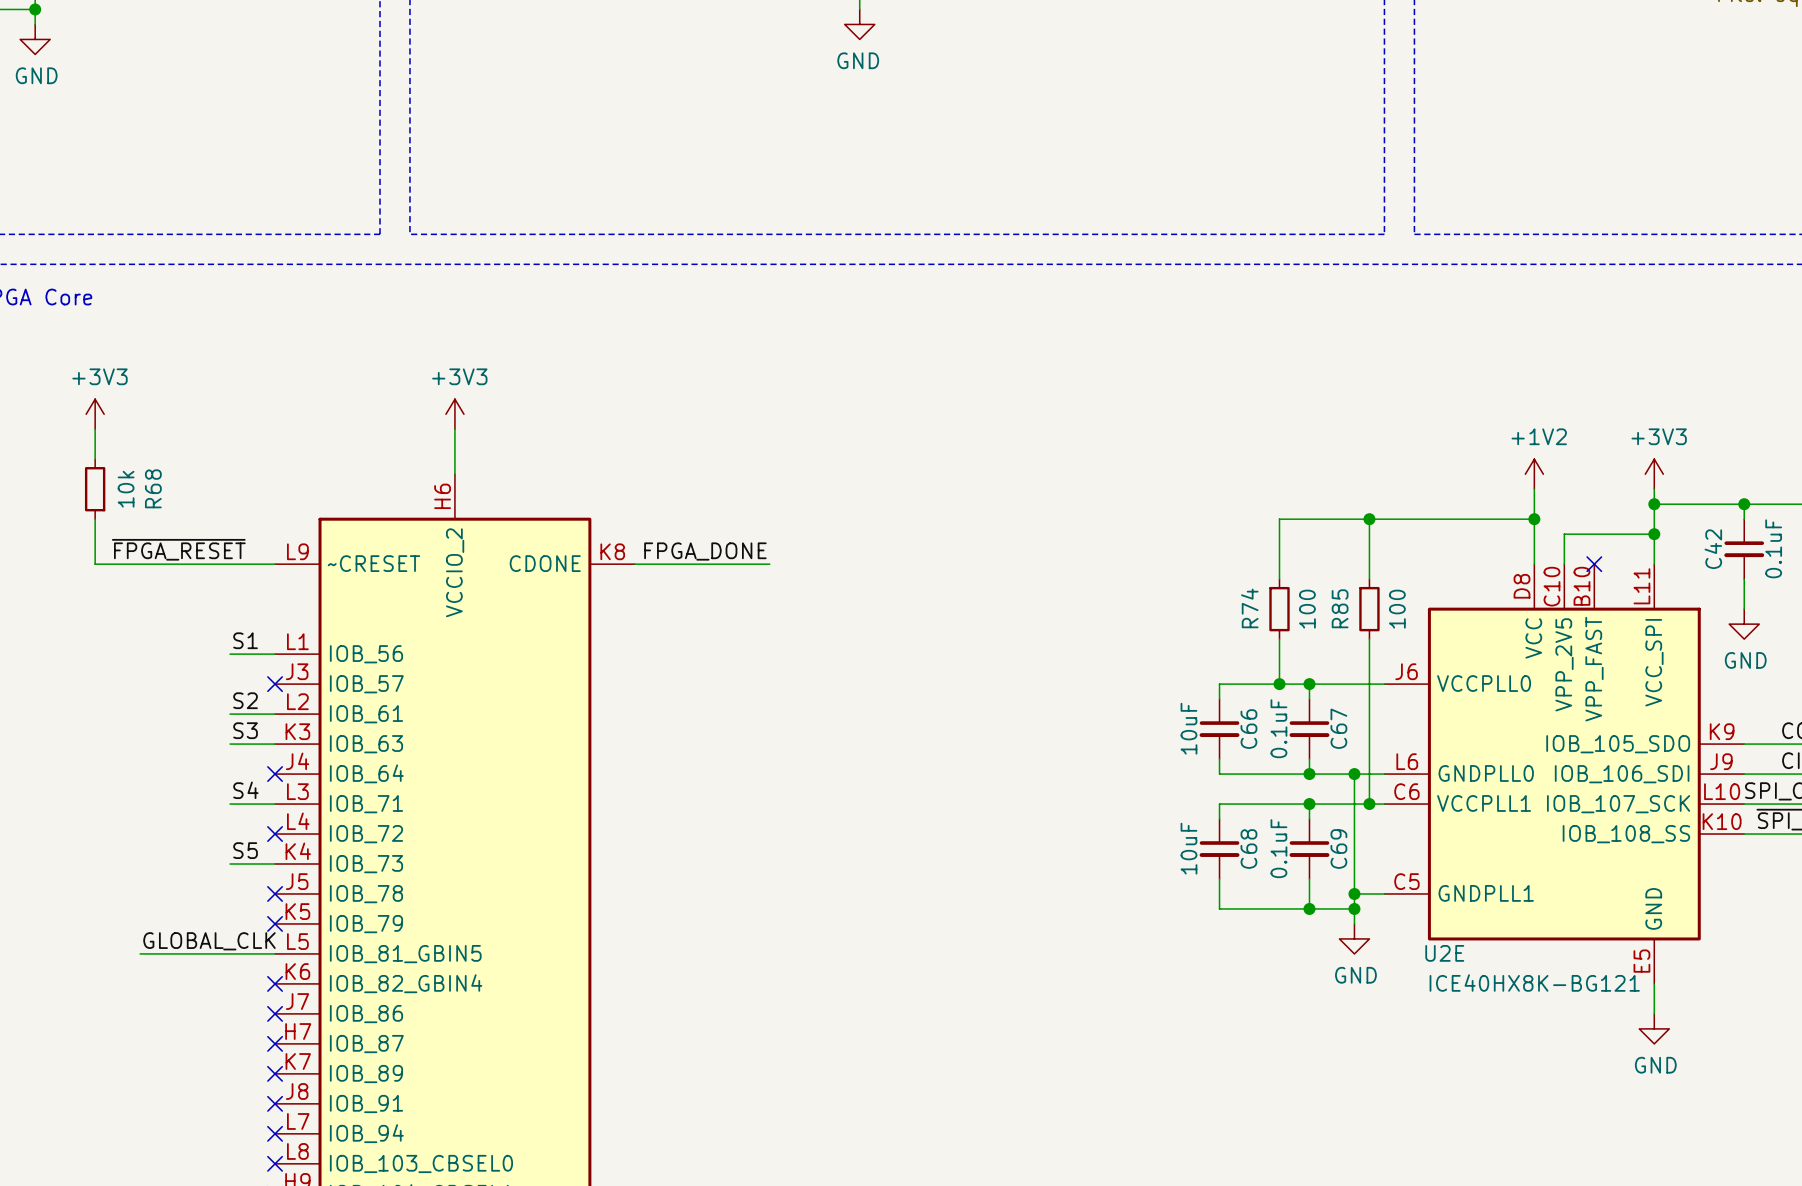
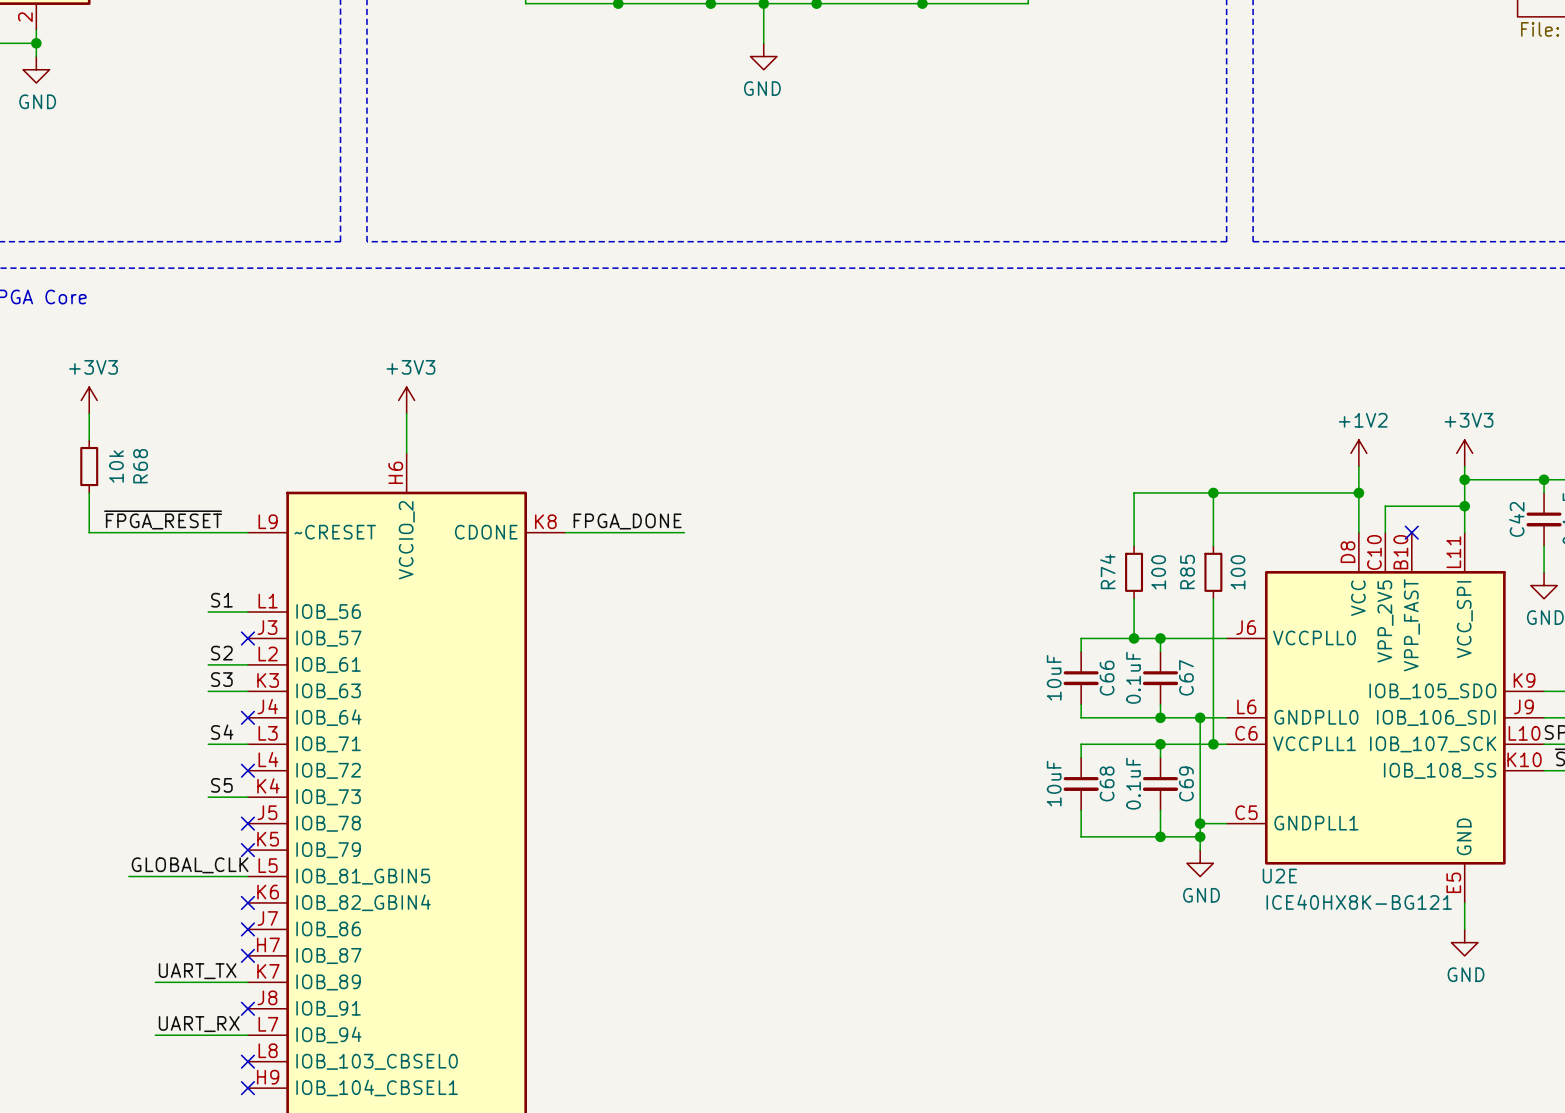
label: none -> UART_TX (197, 971)
wire: none -> (155, 982) (247, 982)
no-connect mark: (275, 1073) -> none
label: none -> UART_RX (199, 1024)
wire: none -> (155, 1035) (247, 1035)
no-connect mark: (275, 1133) -> none

